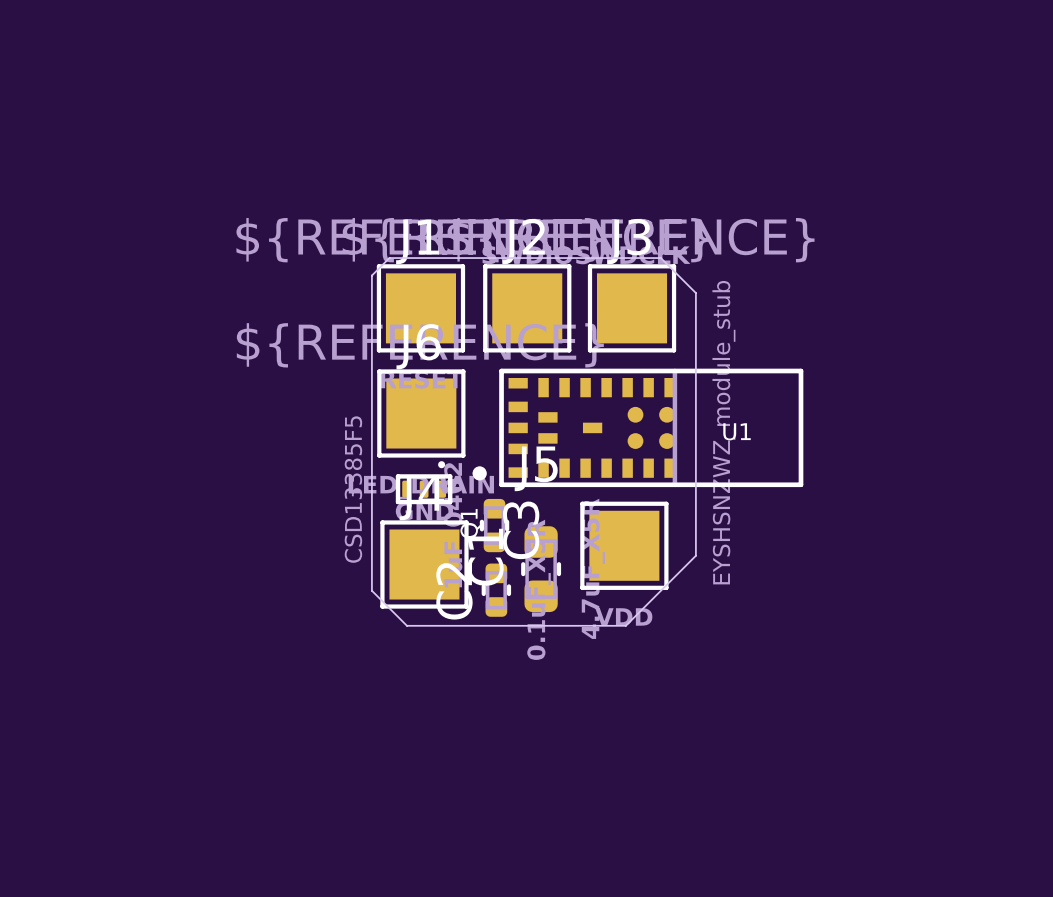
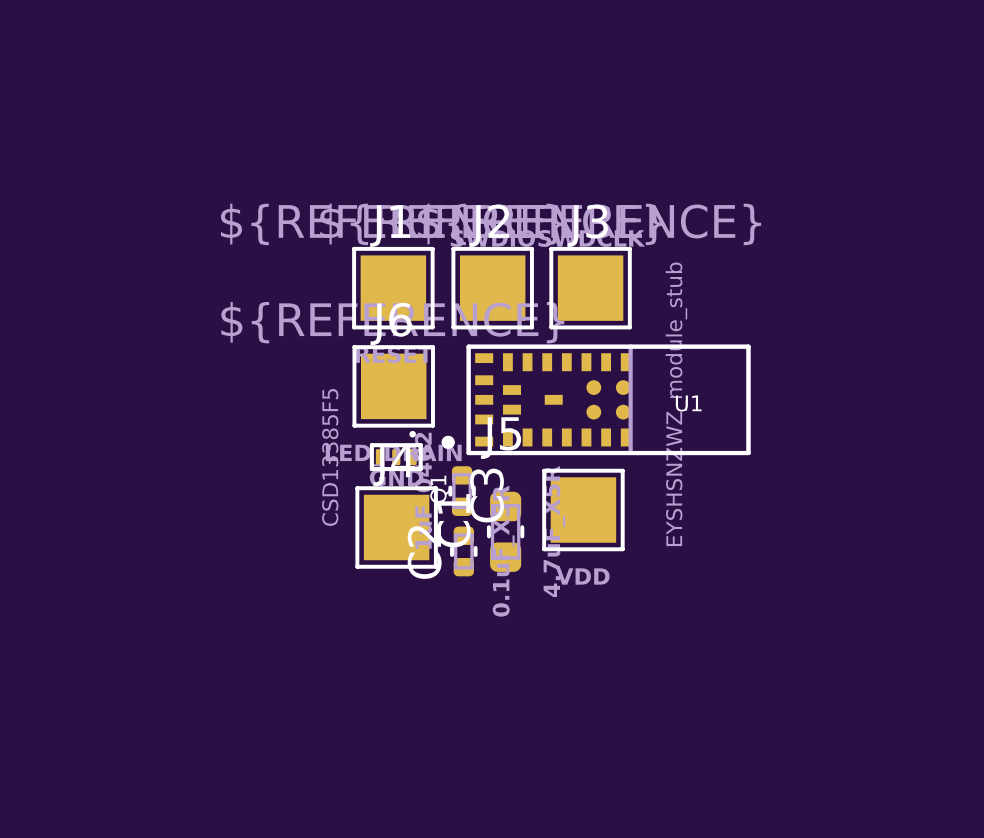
board edge: (389, 258) (371, 275) (371, 590) (406, 625) (625, 625) (695, 555) (695, 293) (660, 258) (389, 258) -> none

